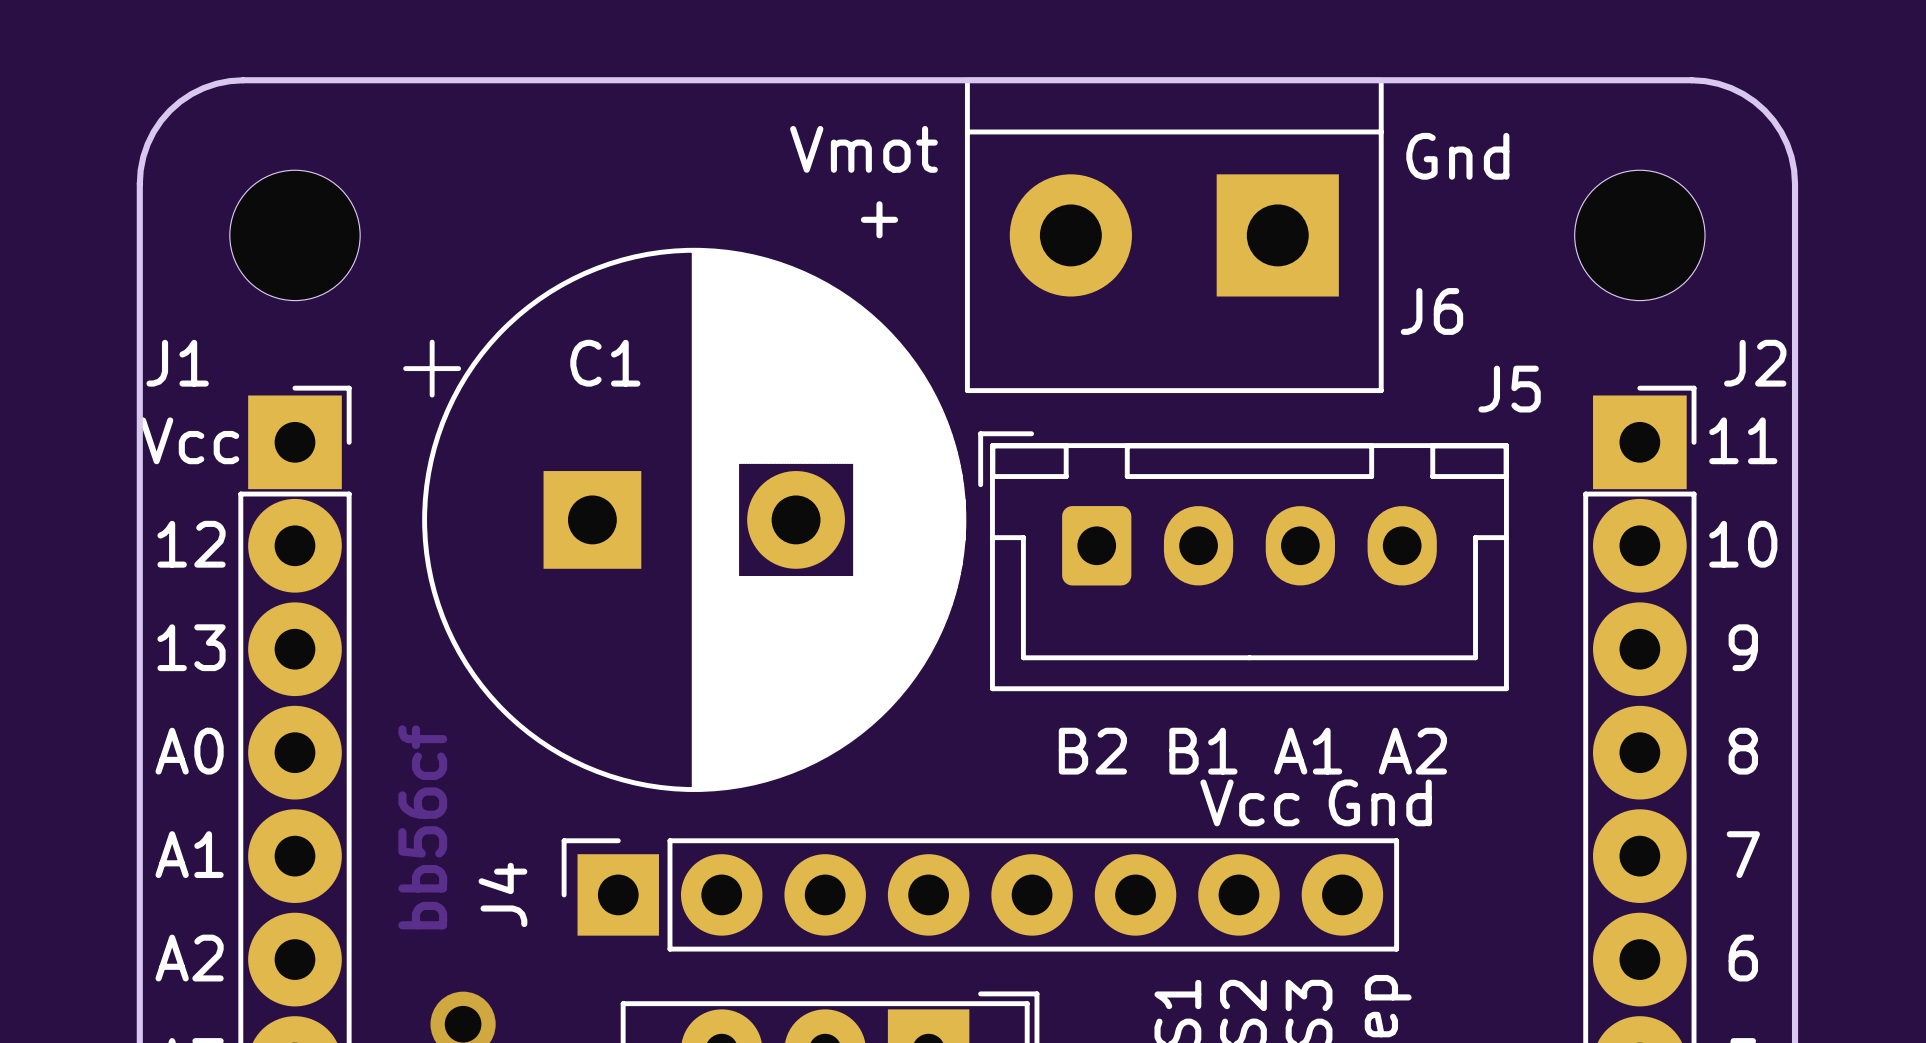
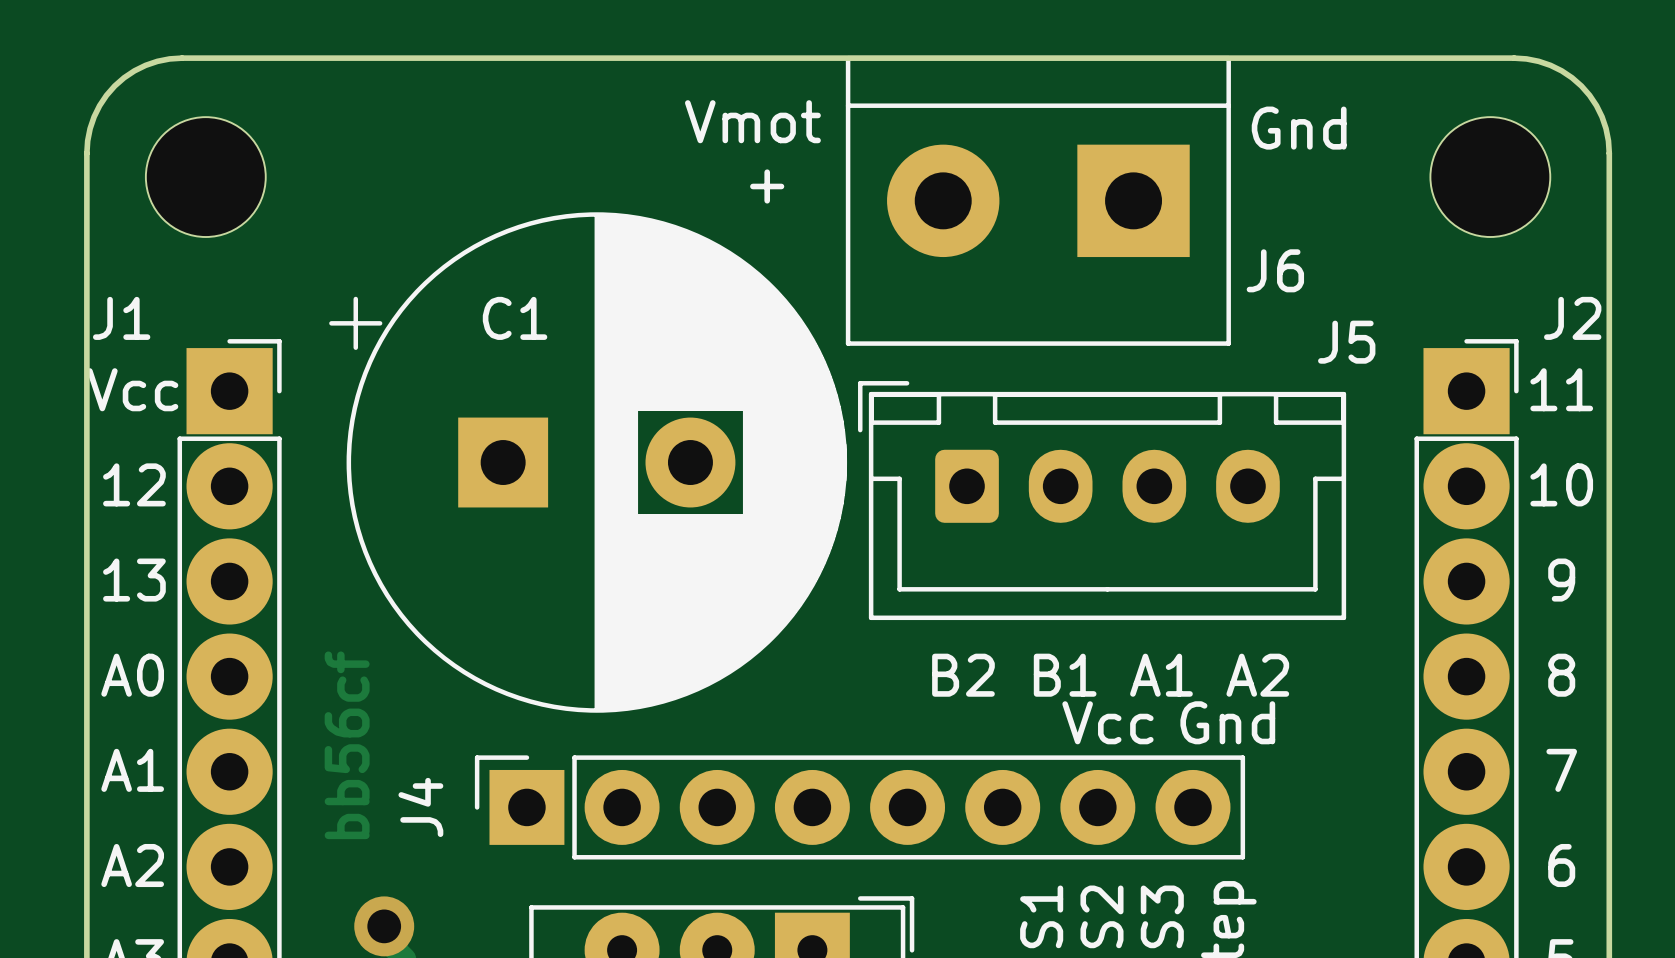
part position: (294, 235) -> (205, 177)
part position: (1639, 235) -> (1490, 177)

